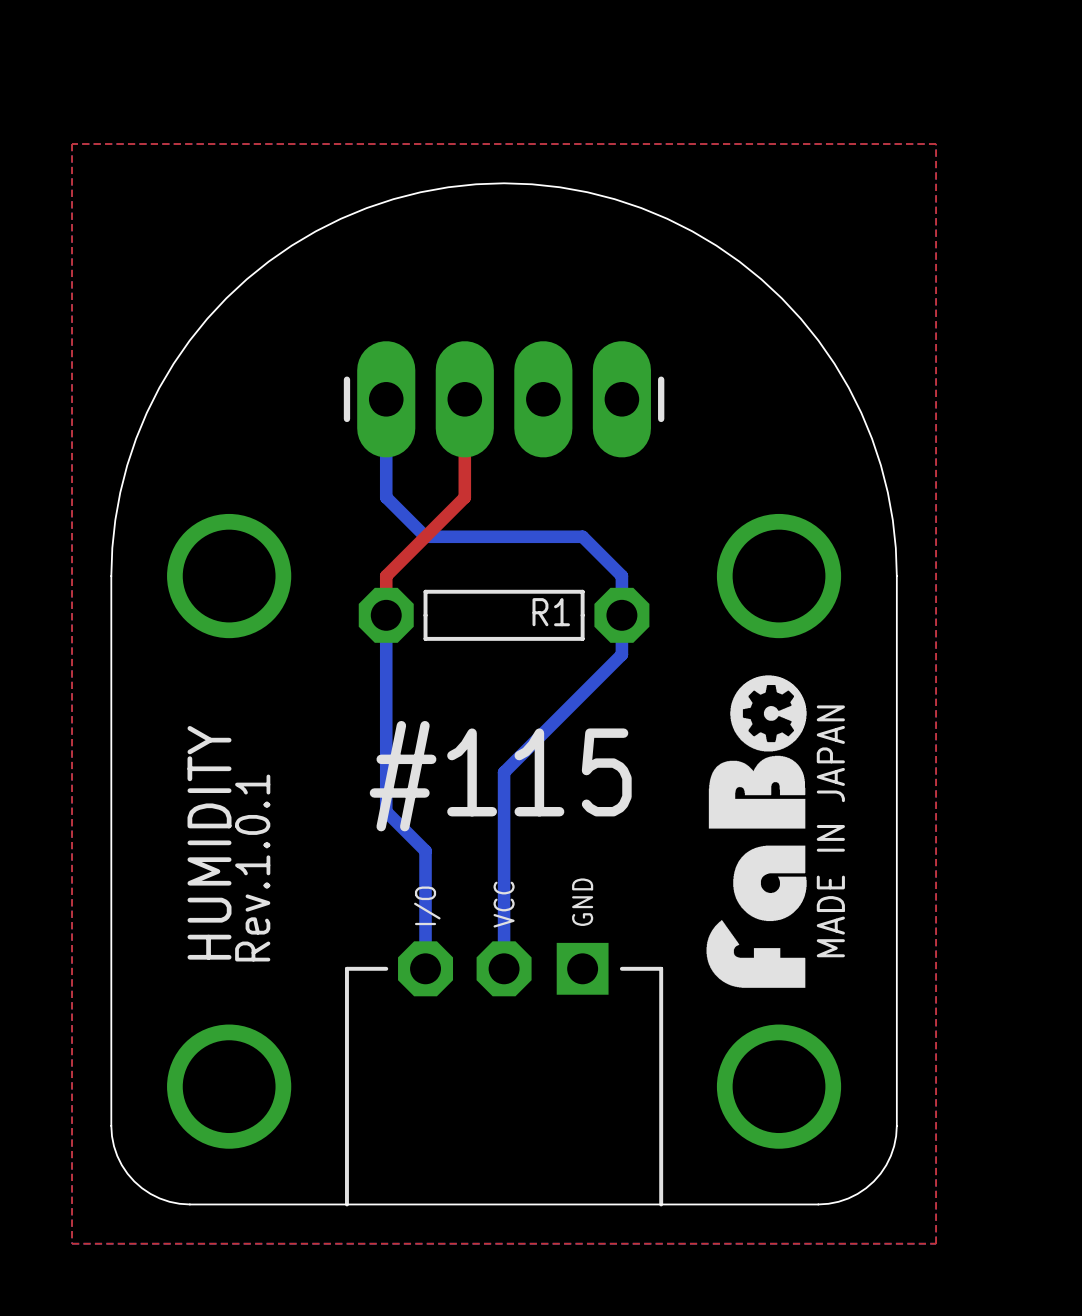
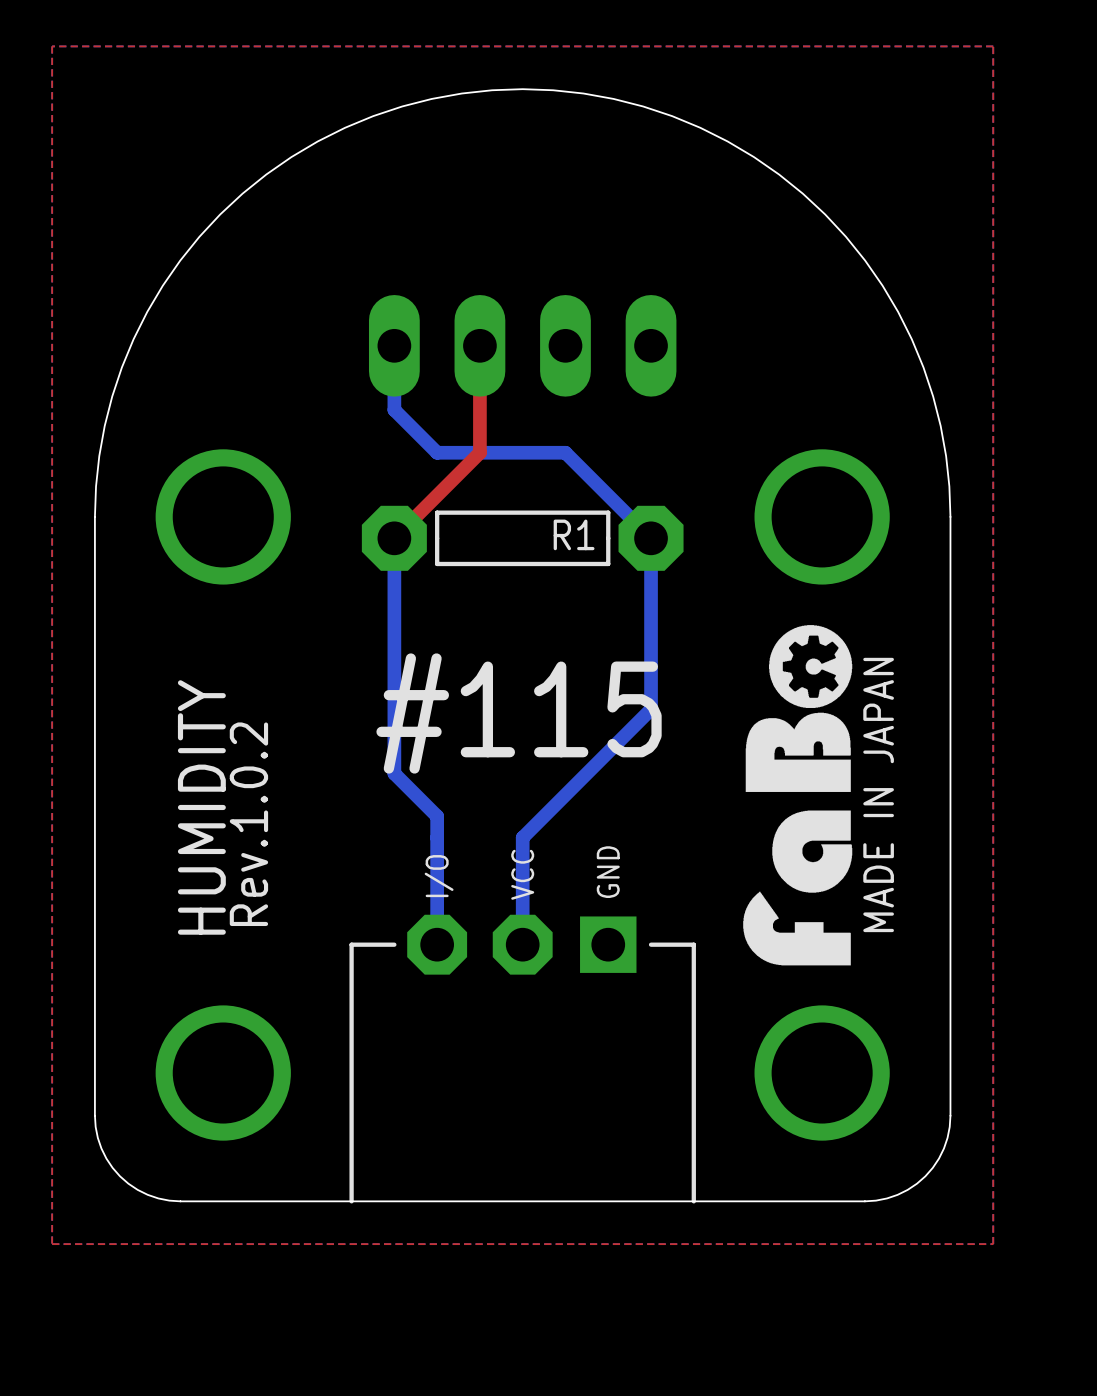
part footprint: [343, 341, 665, 458] -> [368, 295, 677, 397]
bottom track: (386, 477) (386, 497) (425, 536) (582, 536) (621, 576) (621, 595) -> (394, 409) (437, 452) (565, 452) (651, 538)
top track: (464, 497) (386, 576) (386, 615) -> (479, 431) (479, 452) (394, 538)
R1 footprint: [358, 587, 650, 643] -> [361, 505, 684, 571]
R1 name position: R1 (551, 612) -> R1 (574, 534)
bottom track: (621, 654) (504, 772) (504, 870) -> (651, 602) (651, 709) (522, 837)
text position: #115 (500, 776) -> #115 (519, 713)
text: Rev.1.0.1 (252, 868) -> Rev.1.0.2 (248, 824)

